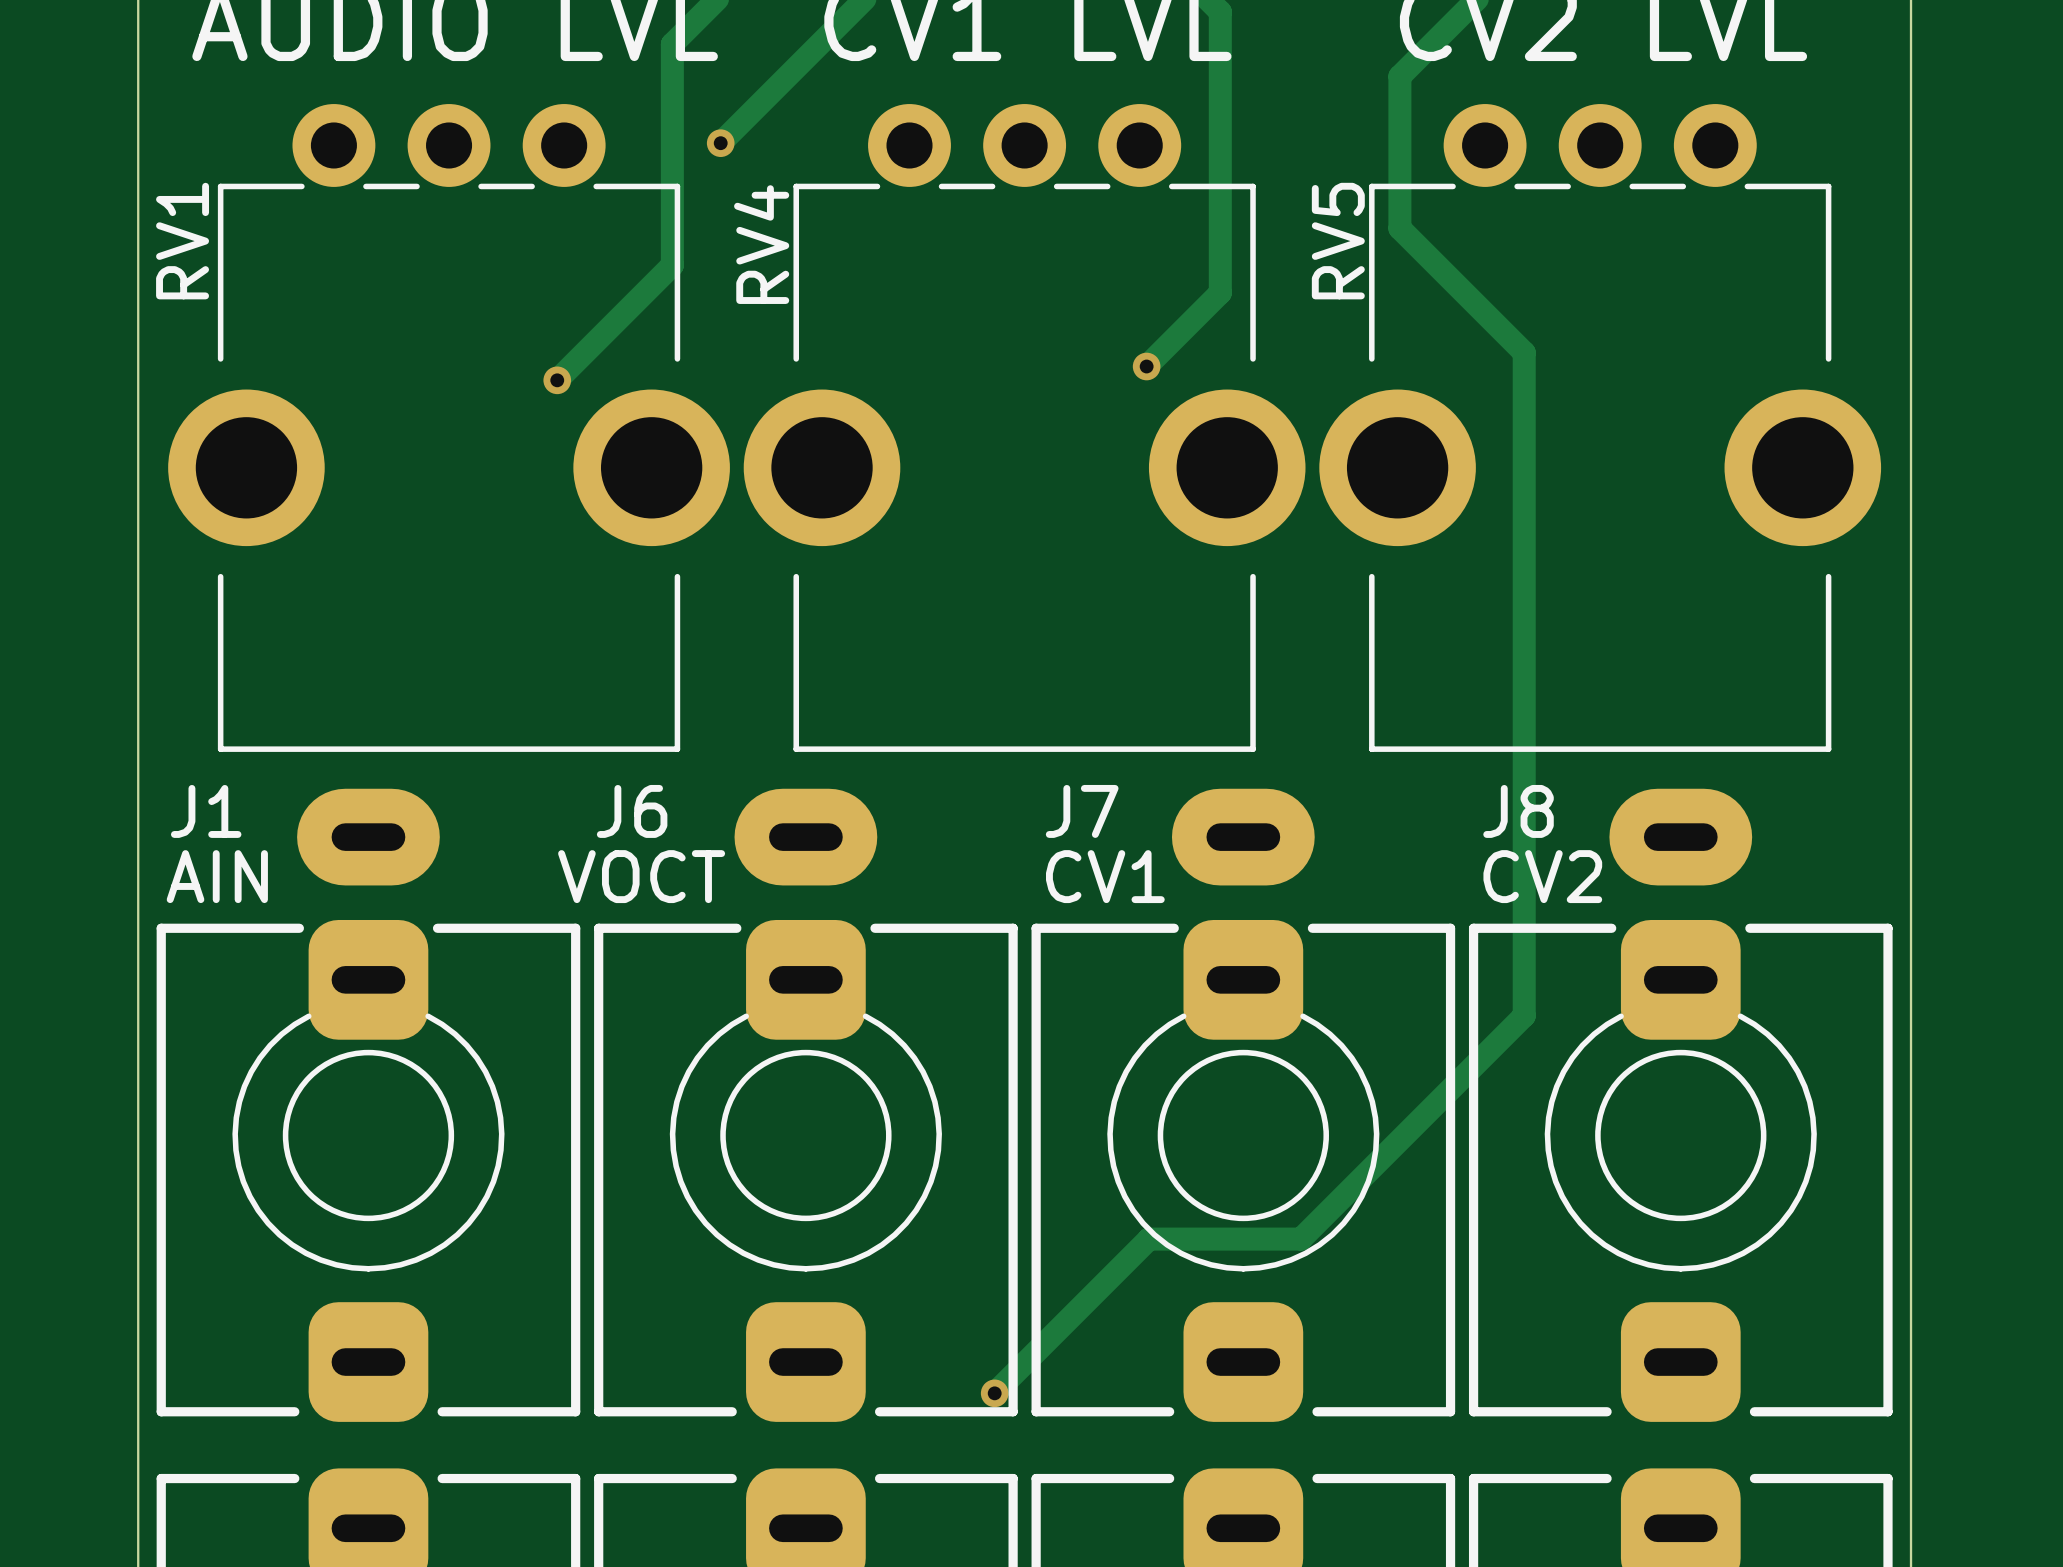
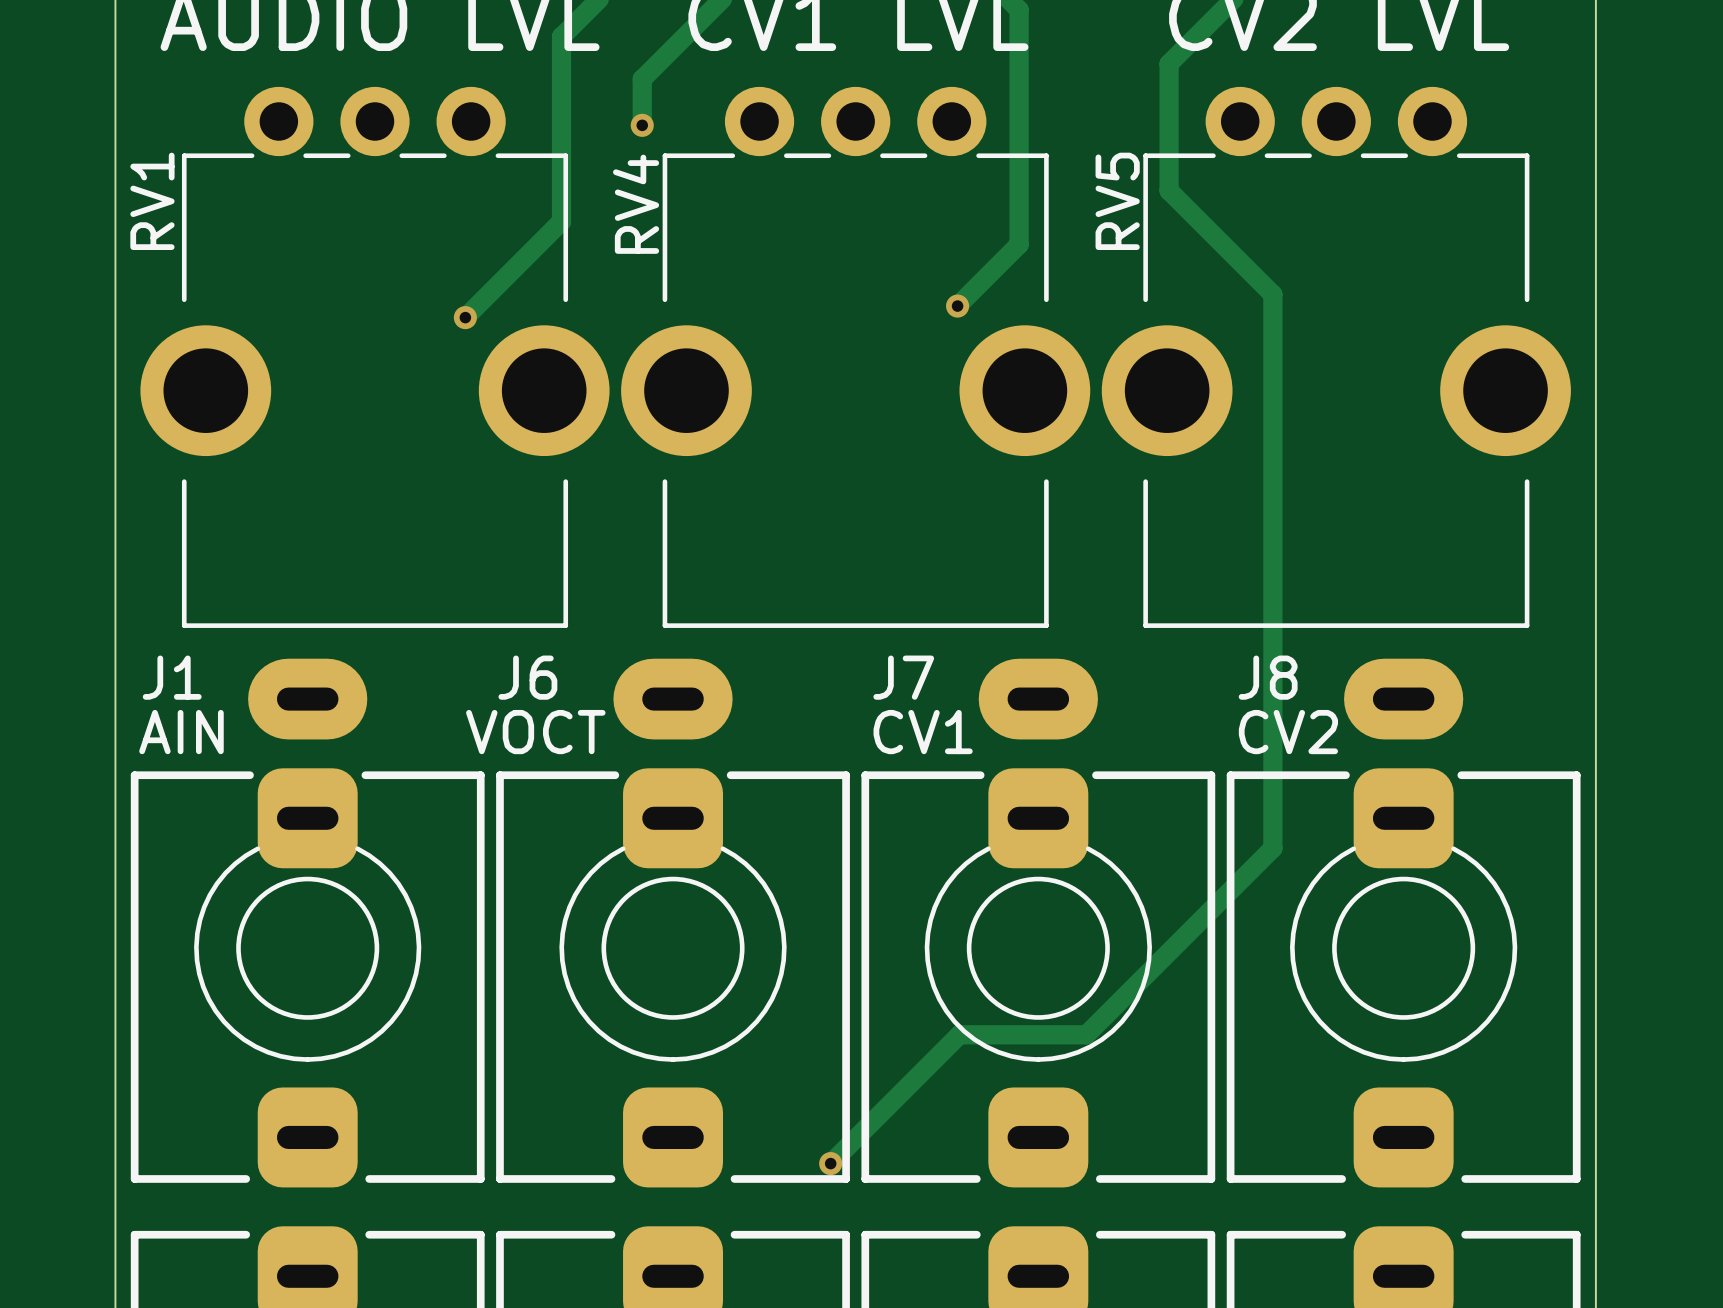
track: (769, 94) (720, 143) -> (642, 79) (642, 125)
via position: (720, 143) -> (642, 125)

